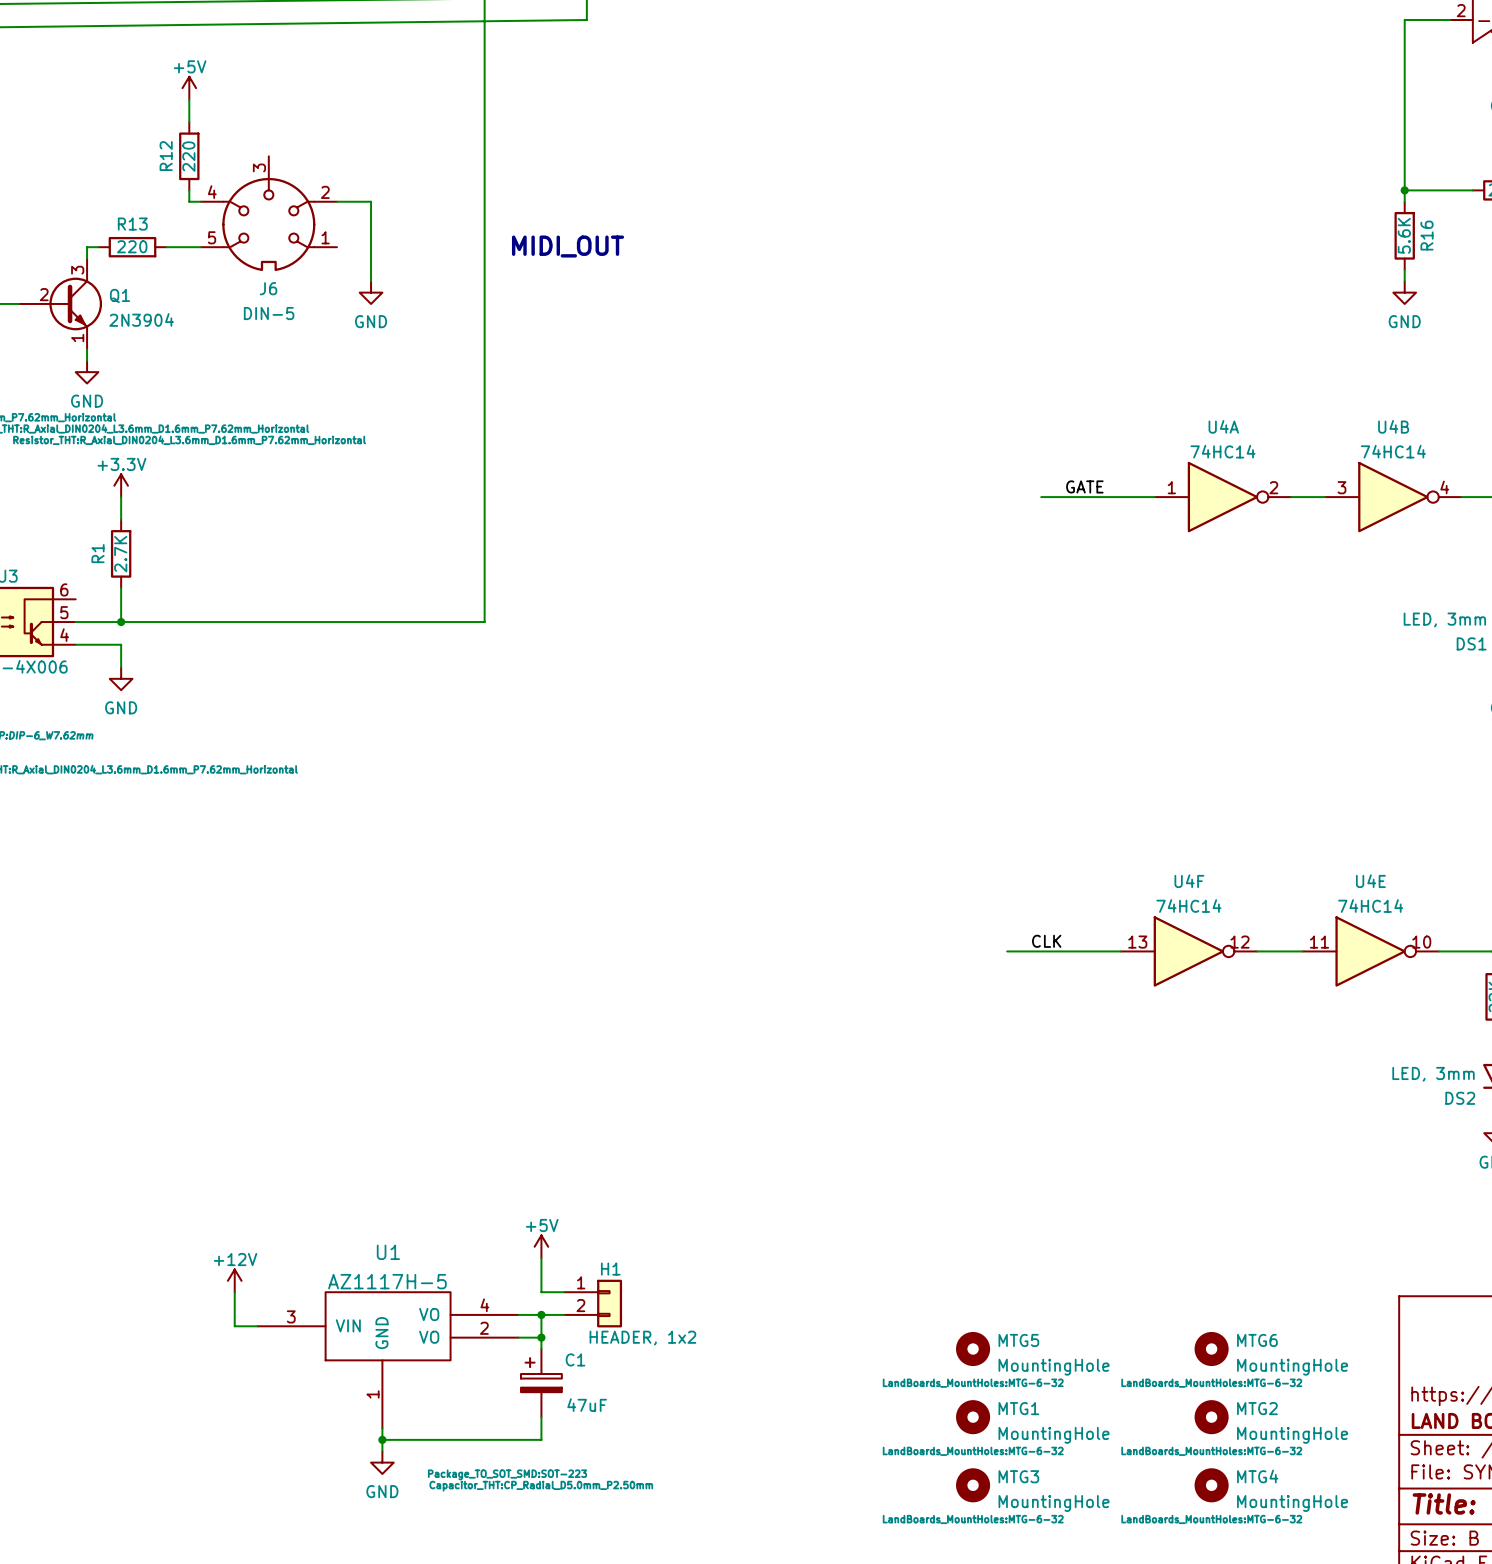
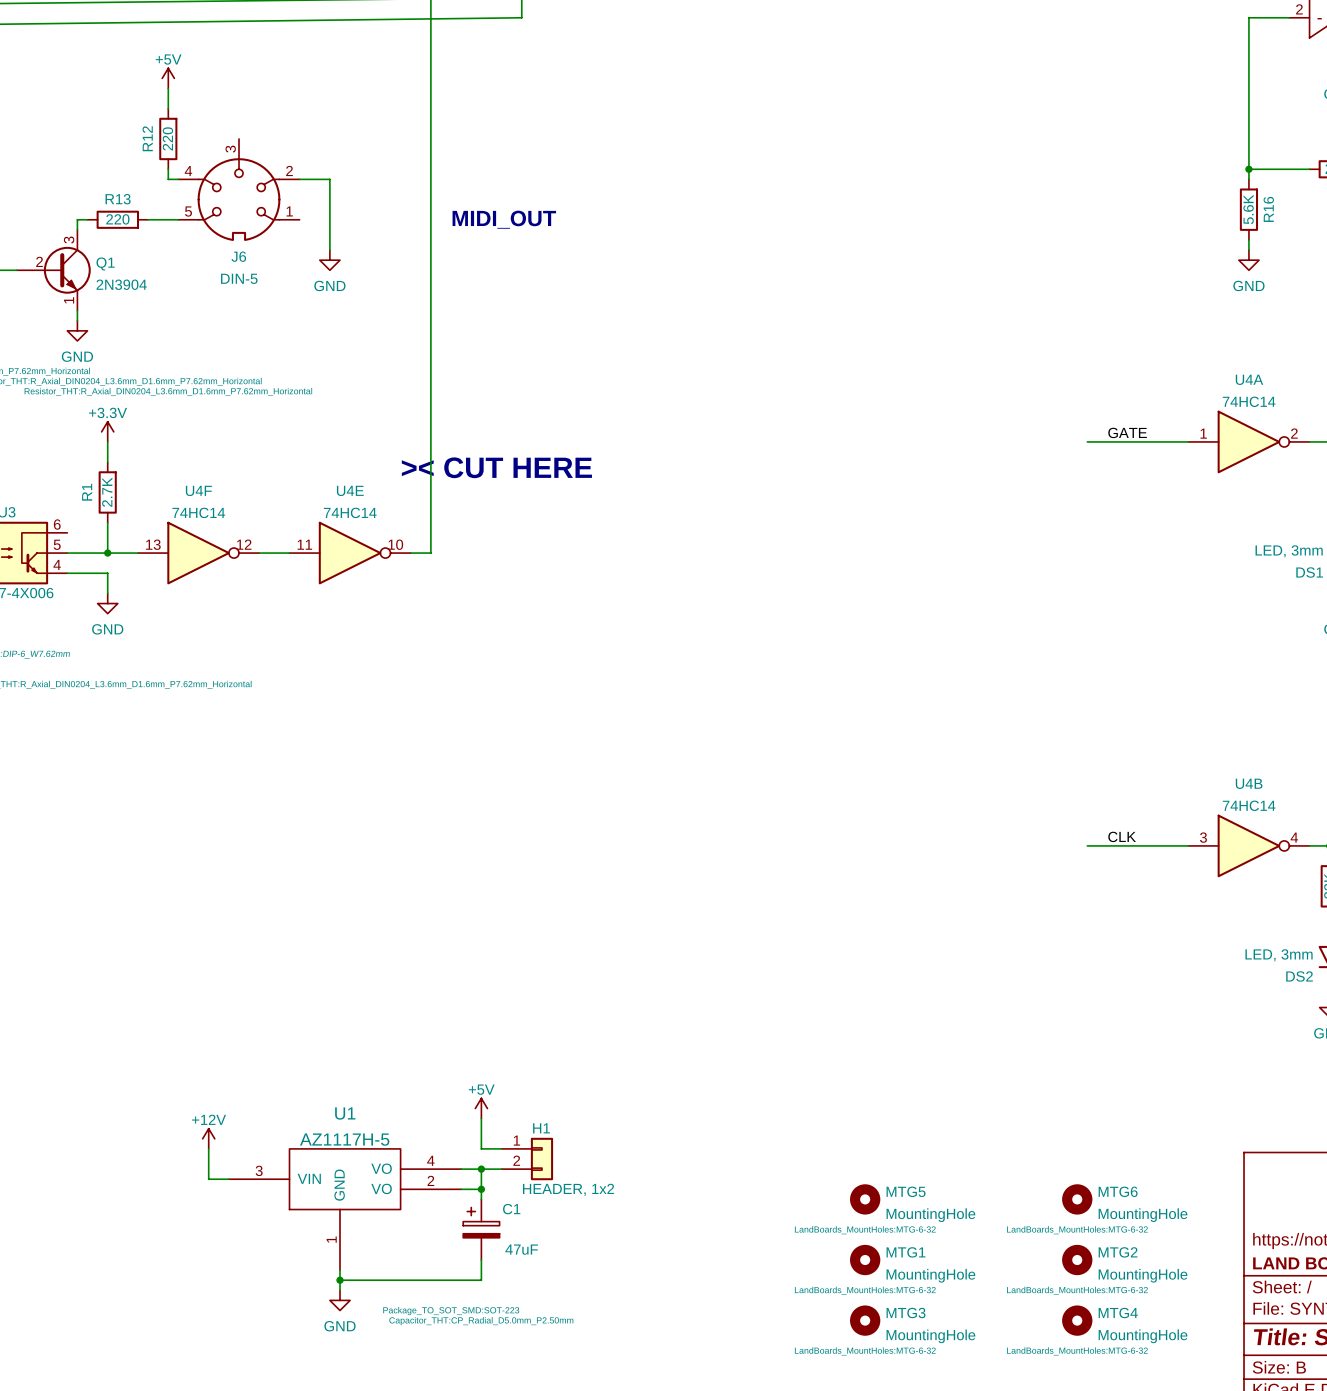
label position: GATE (1084, 486) -> GATE (1127, 432)
wire: (1041, 497) (1154, 497) -> none
U4A position: (1222, 497) -> (1248, 441)
U4B position: (1393, 497) -> (1248, 845)
text: none -> >< CUT HERE (496, 467)
label position: CLK (1046, 941) -> CLK (1122, 836)
wire: (1007, 951) (1120, 951) -> none
U4F position: (1188, 951) -> (198, 553)
U4E position: (1370, 951) -> (350, 553)

